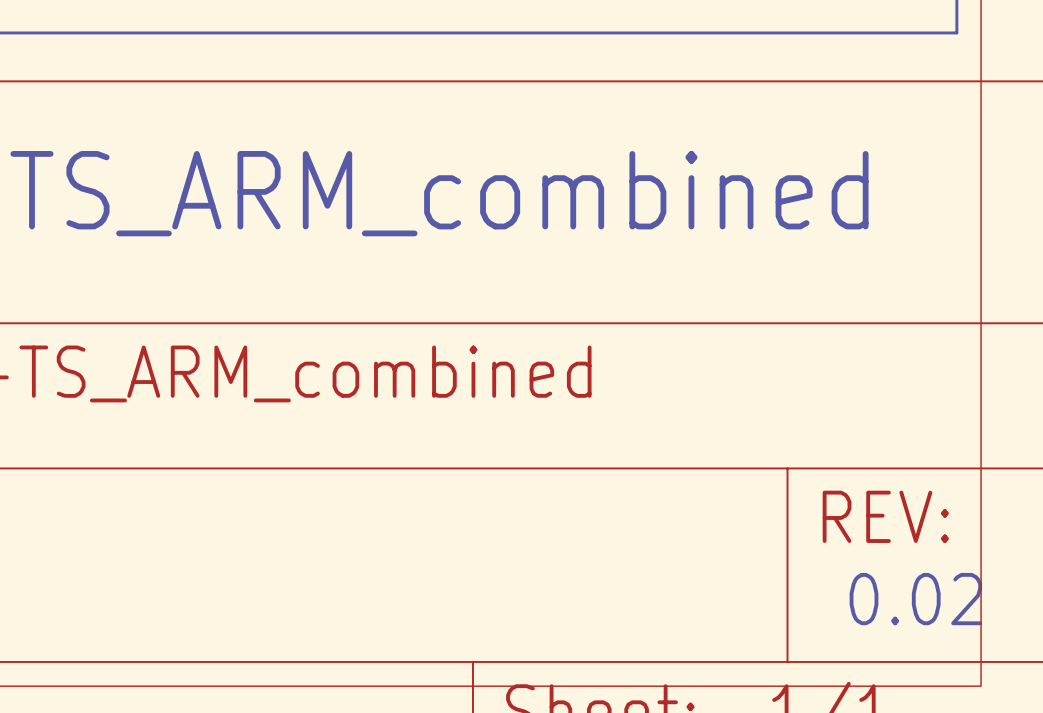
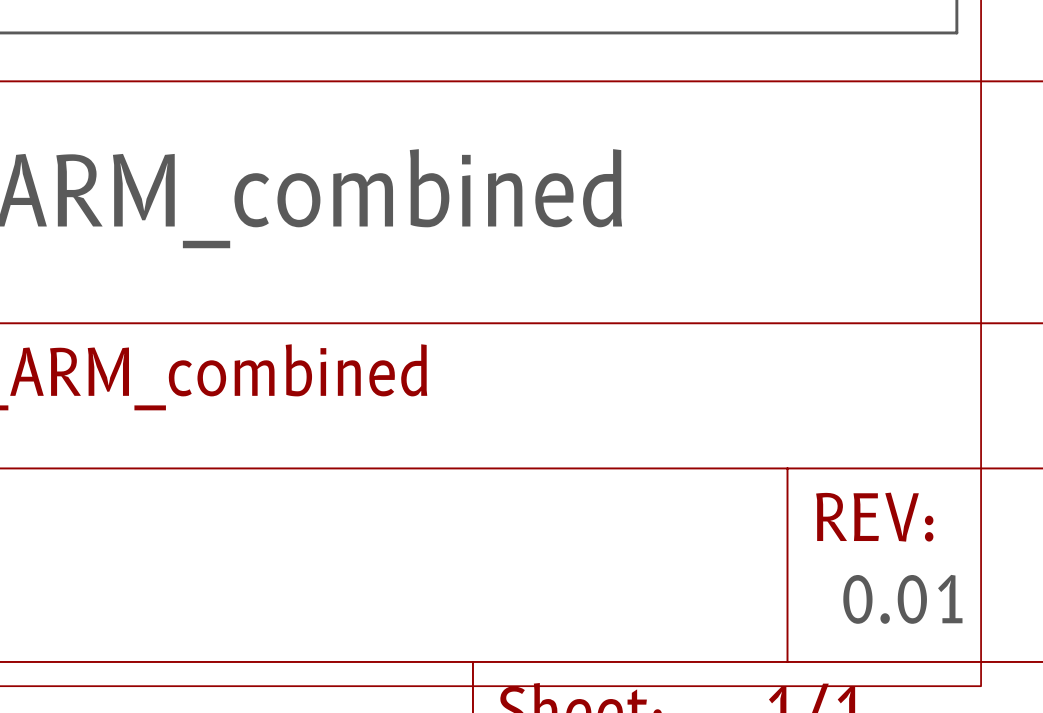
text: 0.02 (915, 599) -> 0.01 (902, 599)

